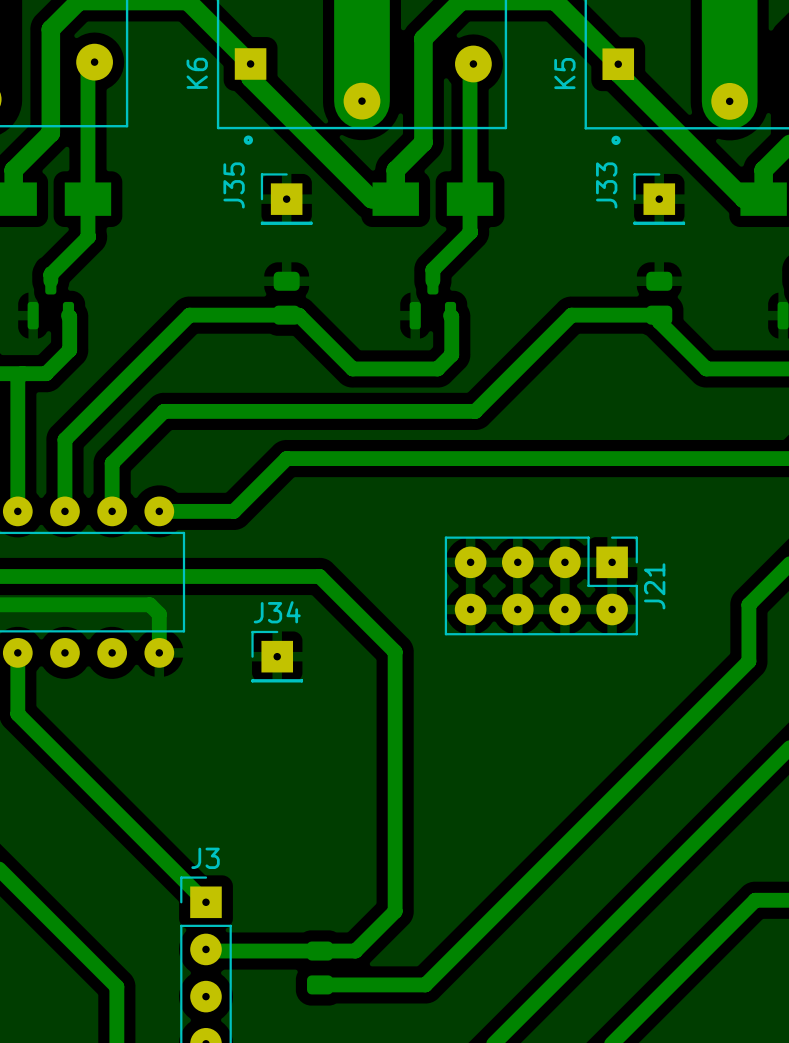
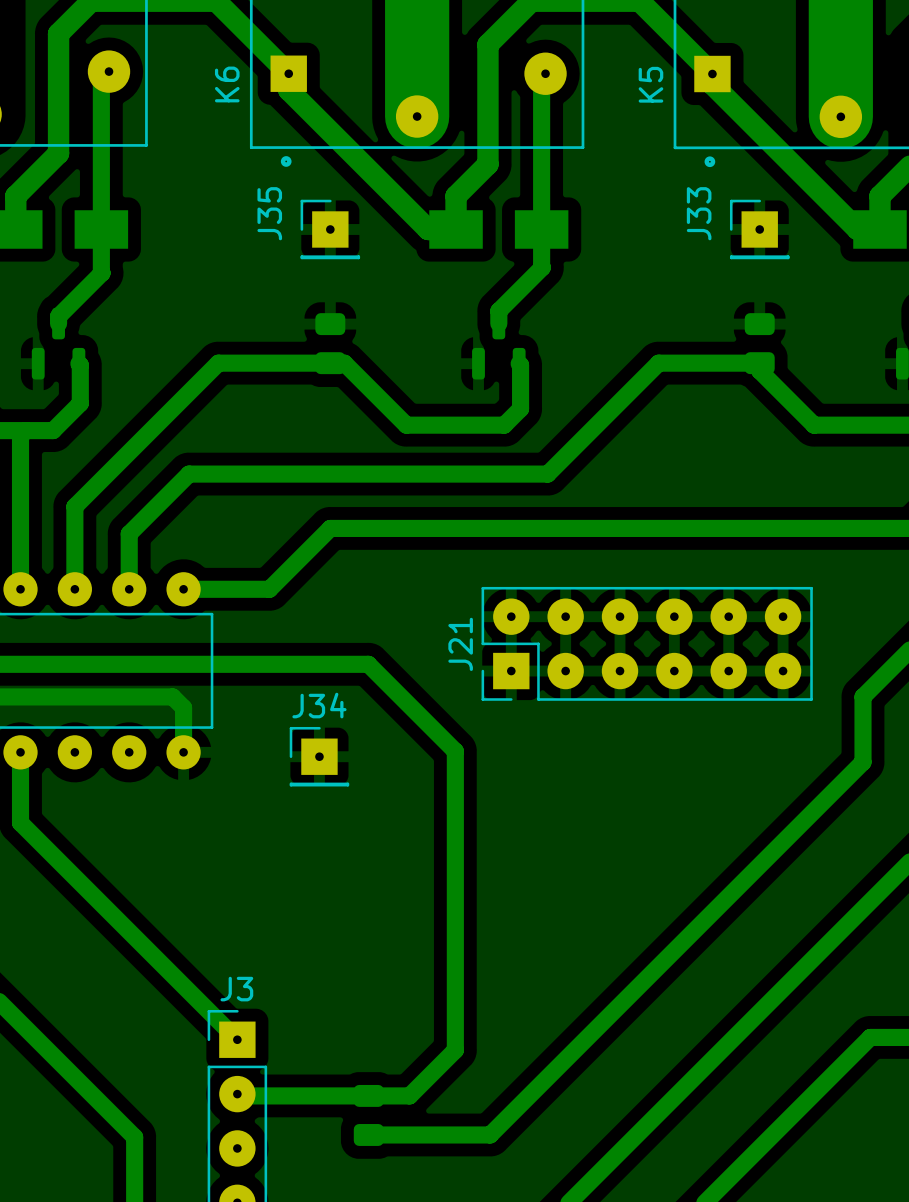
J21 footprint: [444, 536, 638, 636] -> [481, 586, 813, 701]
J21 name position: J21 (654, 586) -> J21 (460, 644)

